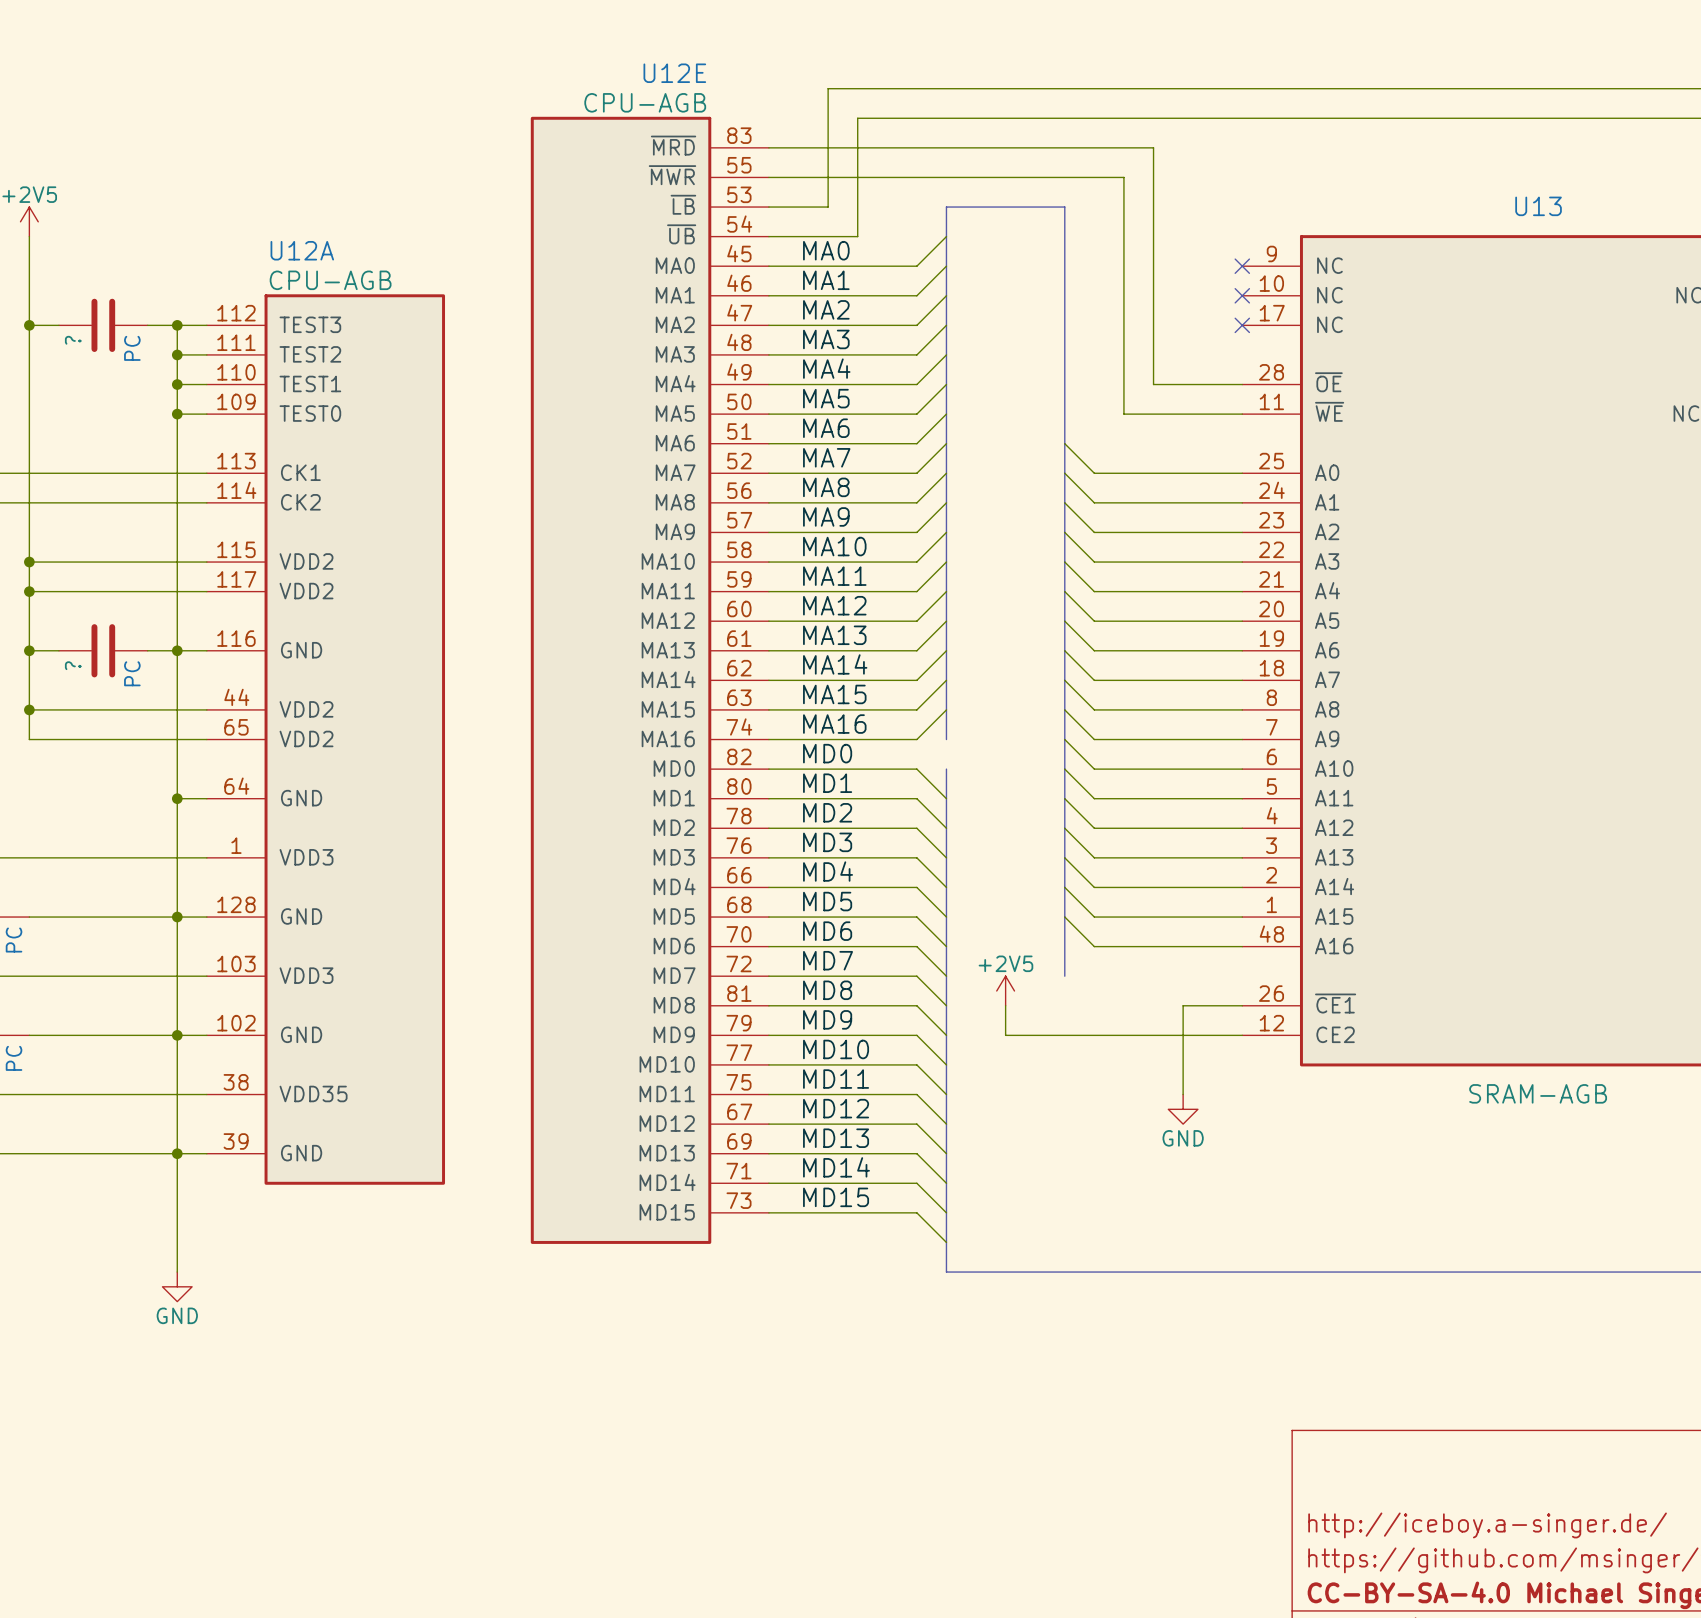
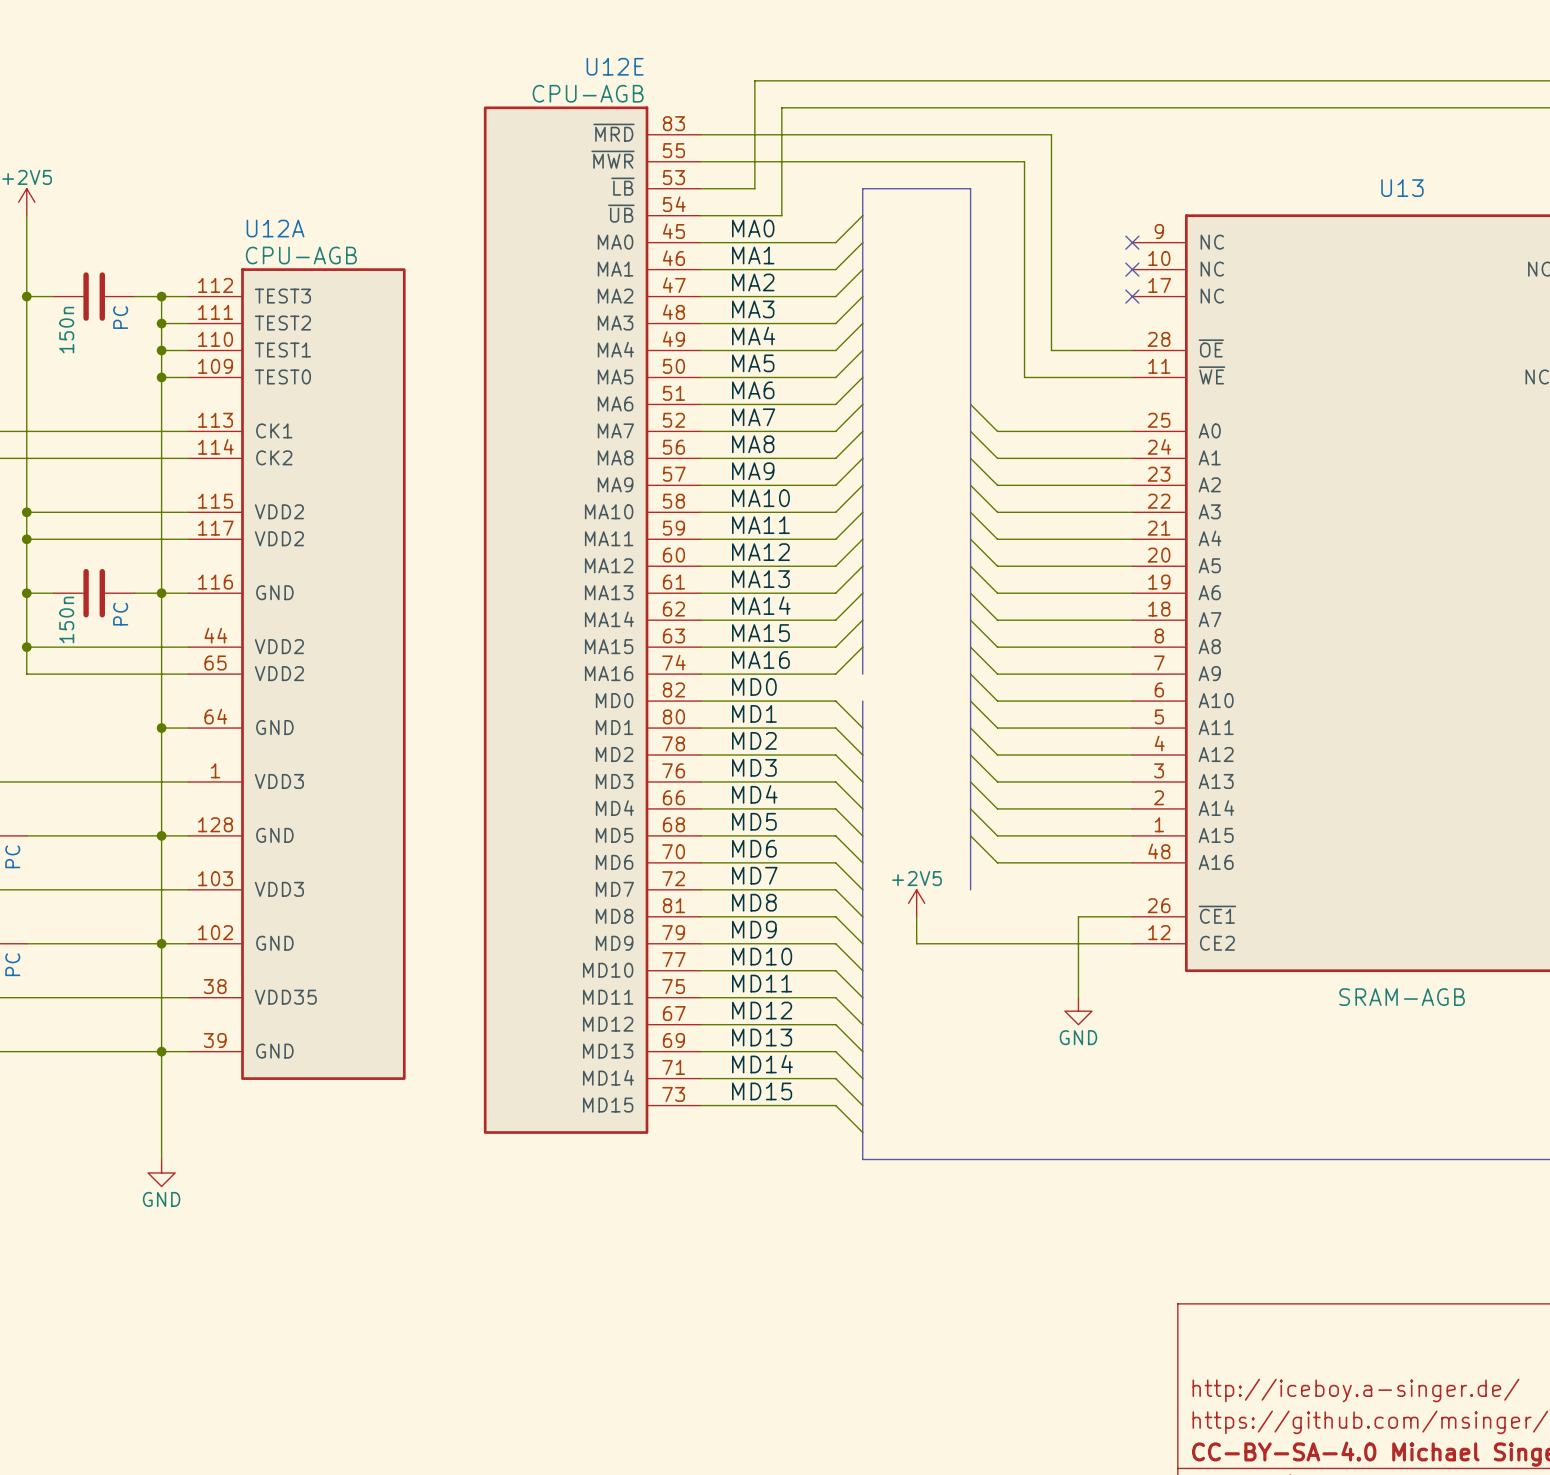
PC value: ? (73, 340) -> 150n (66, 330)
PC value: ? (73, 665) -> 150n (66, 619)

